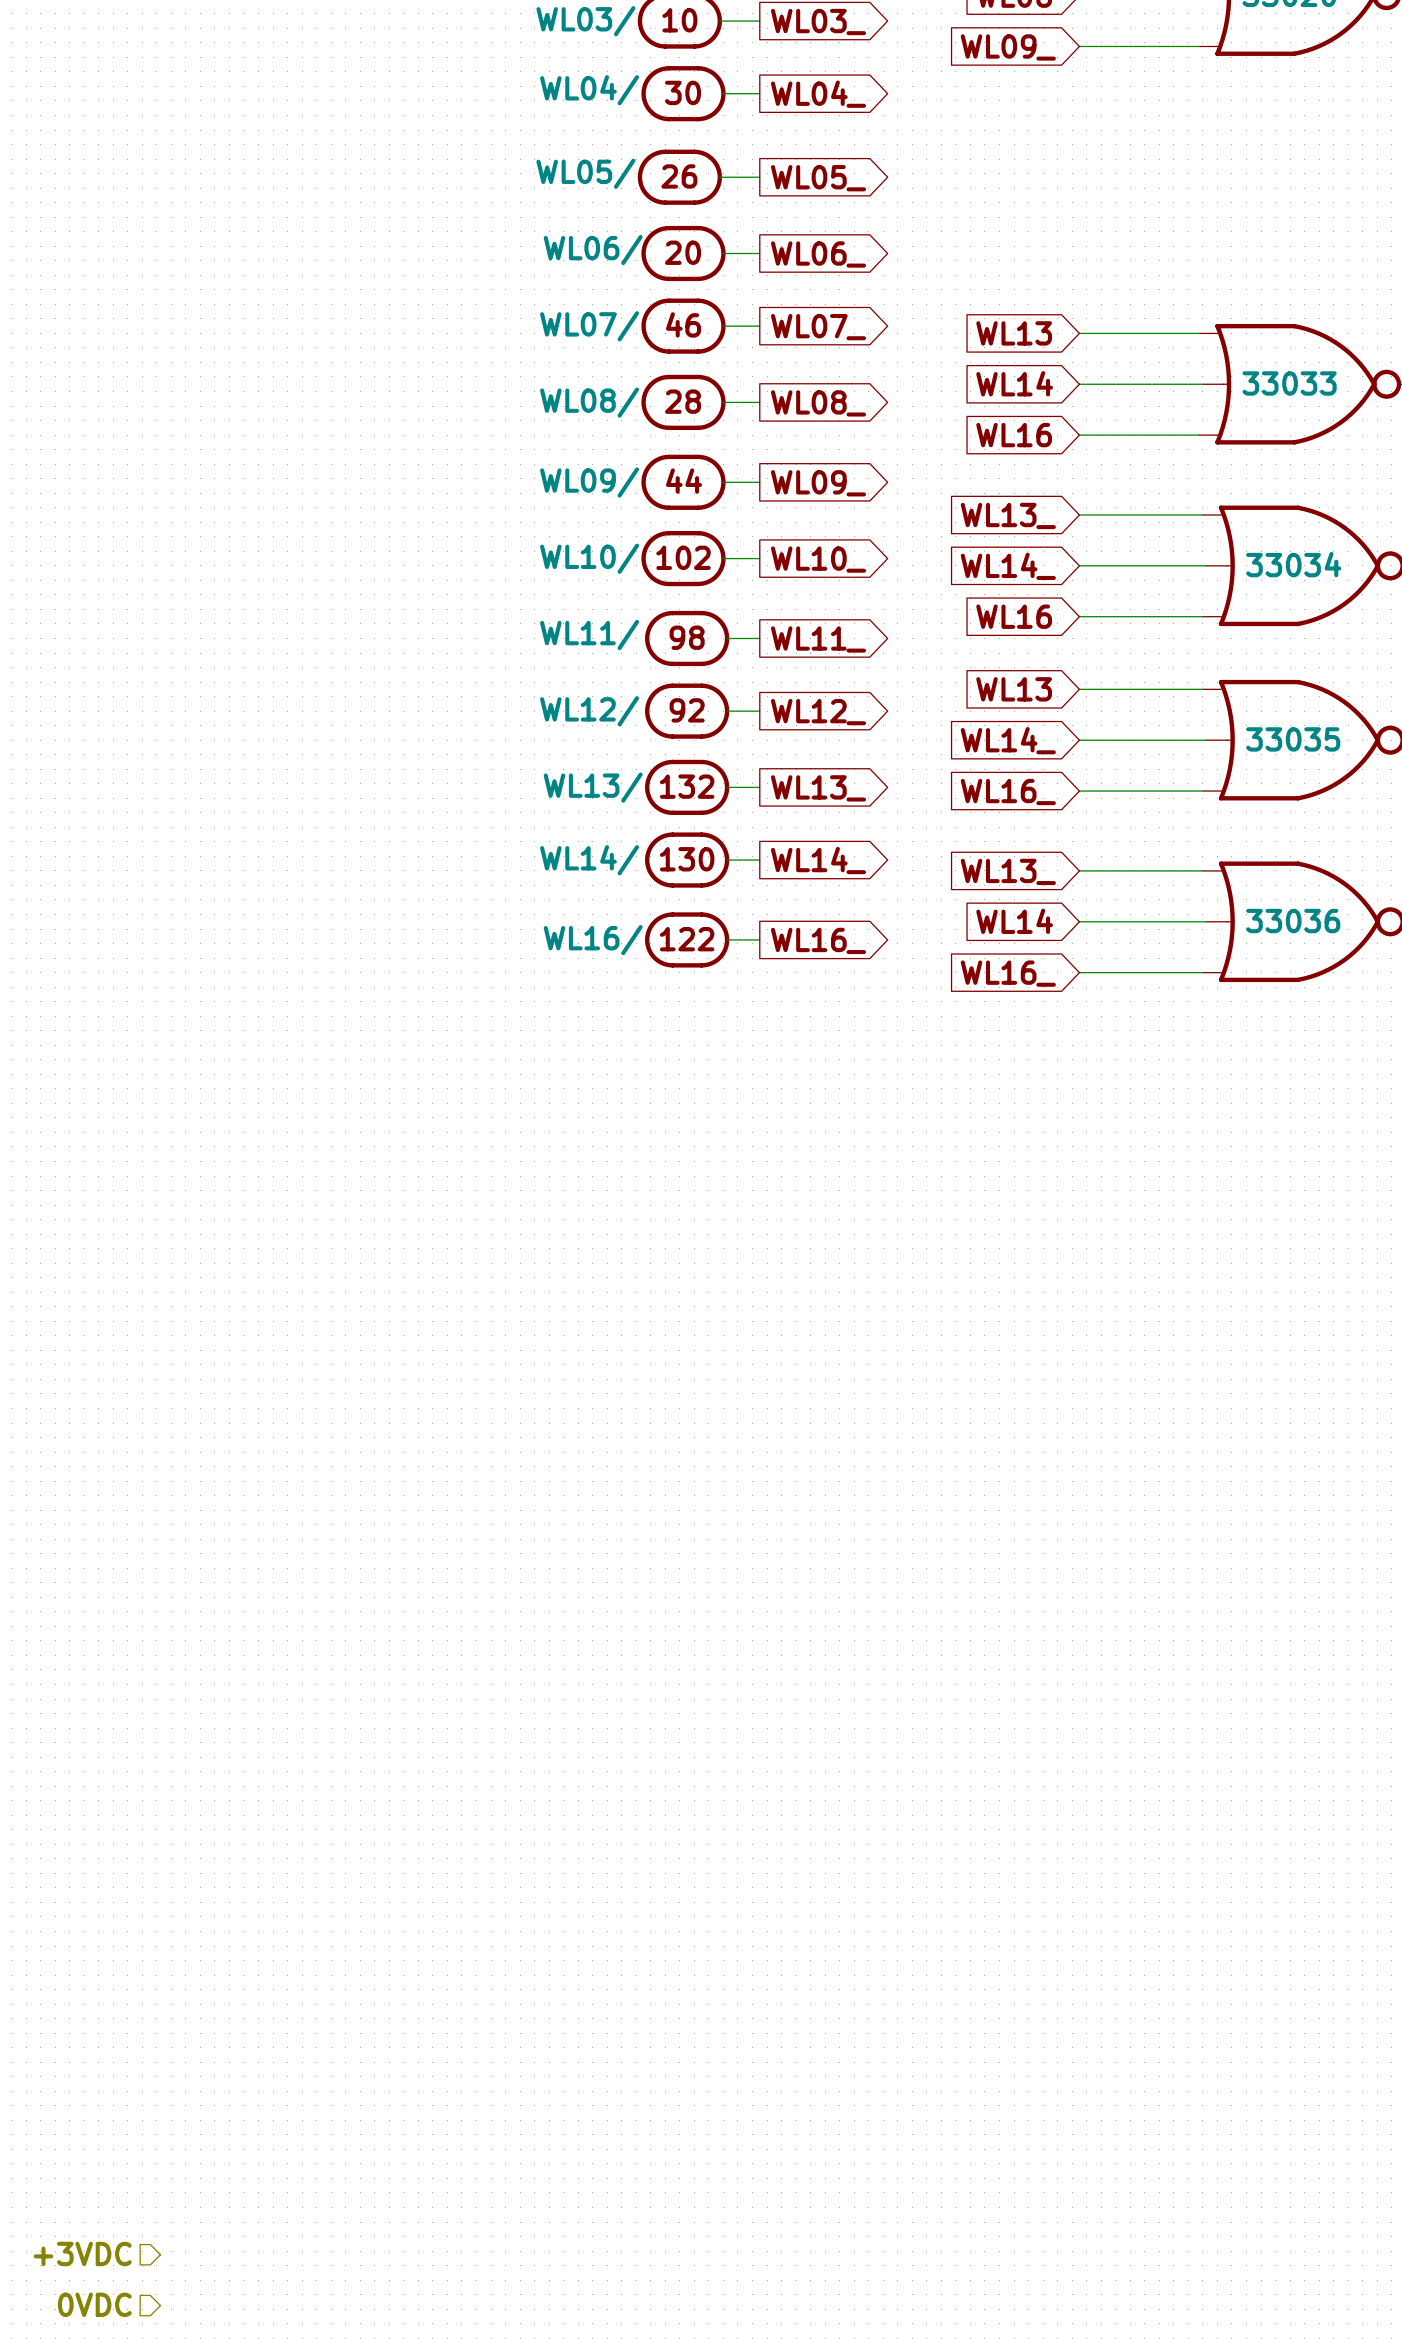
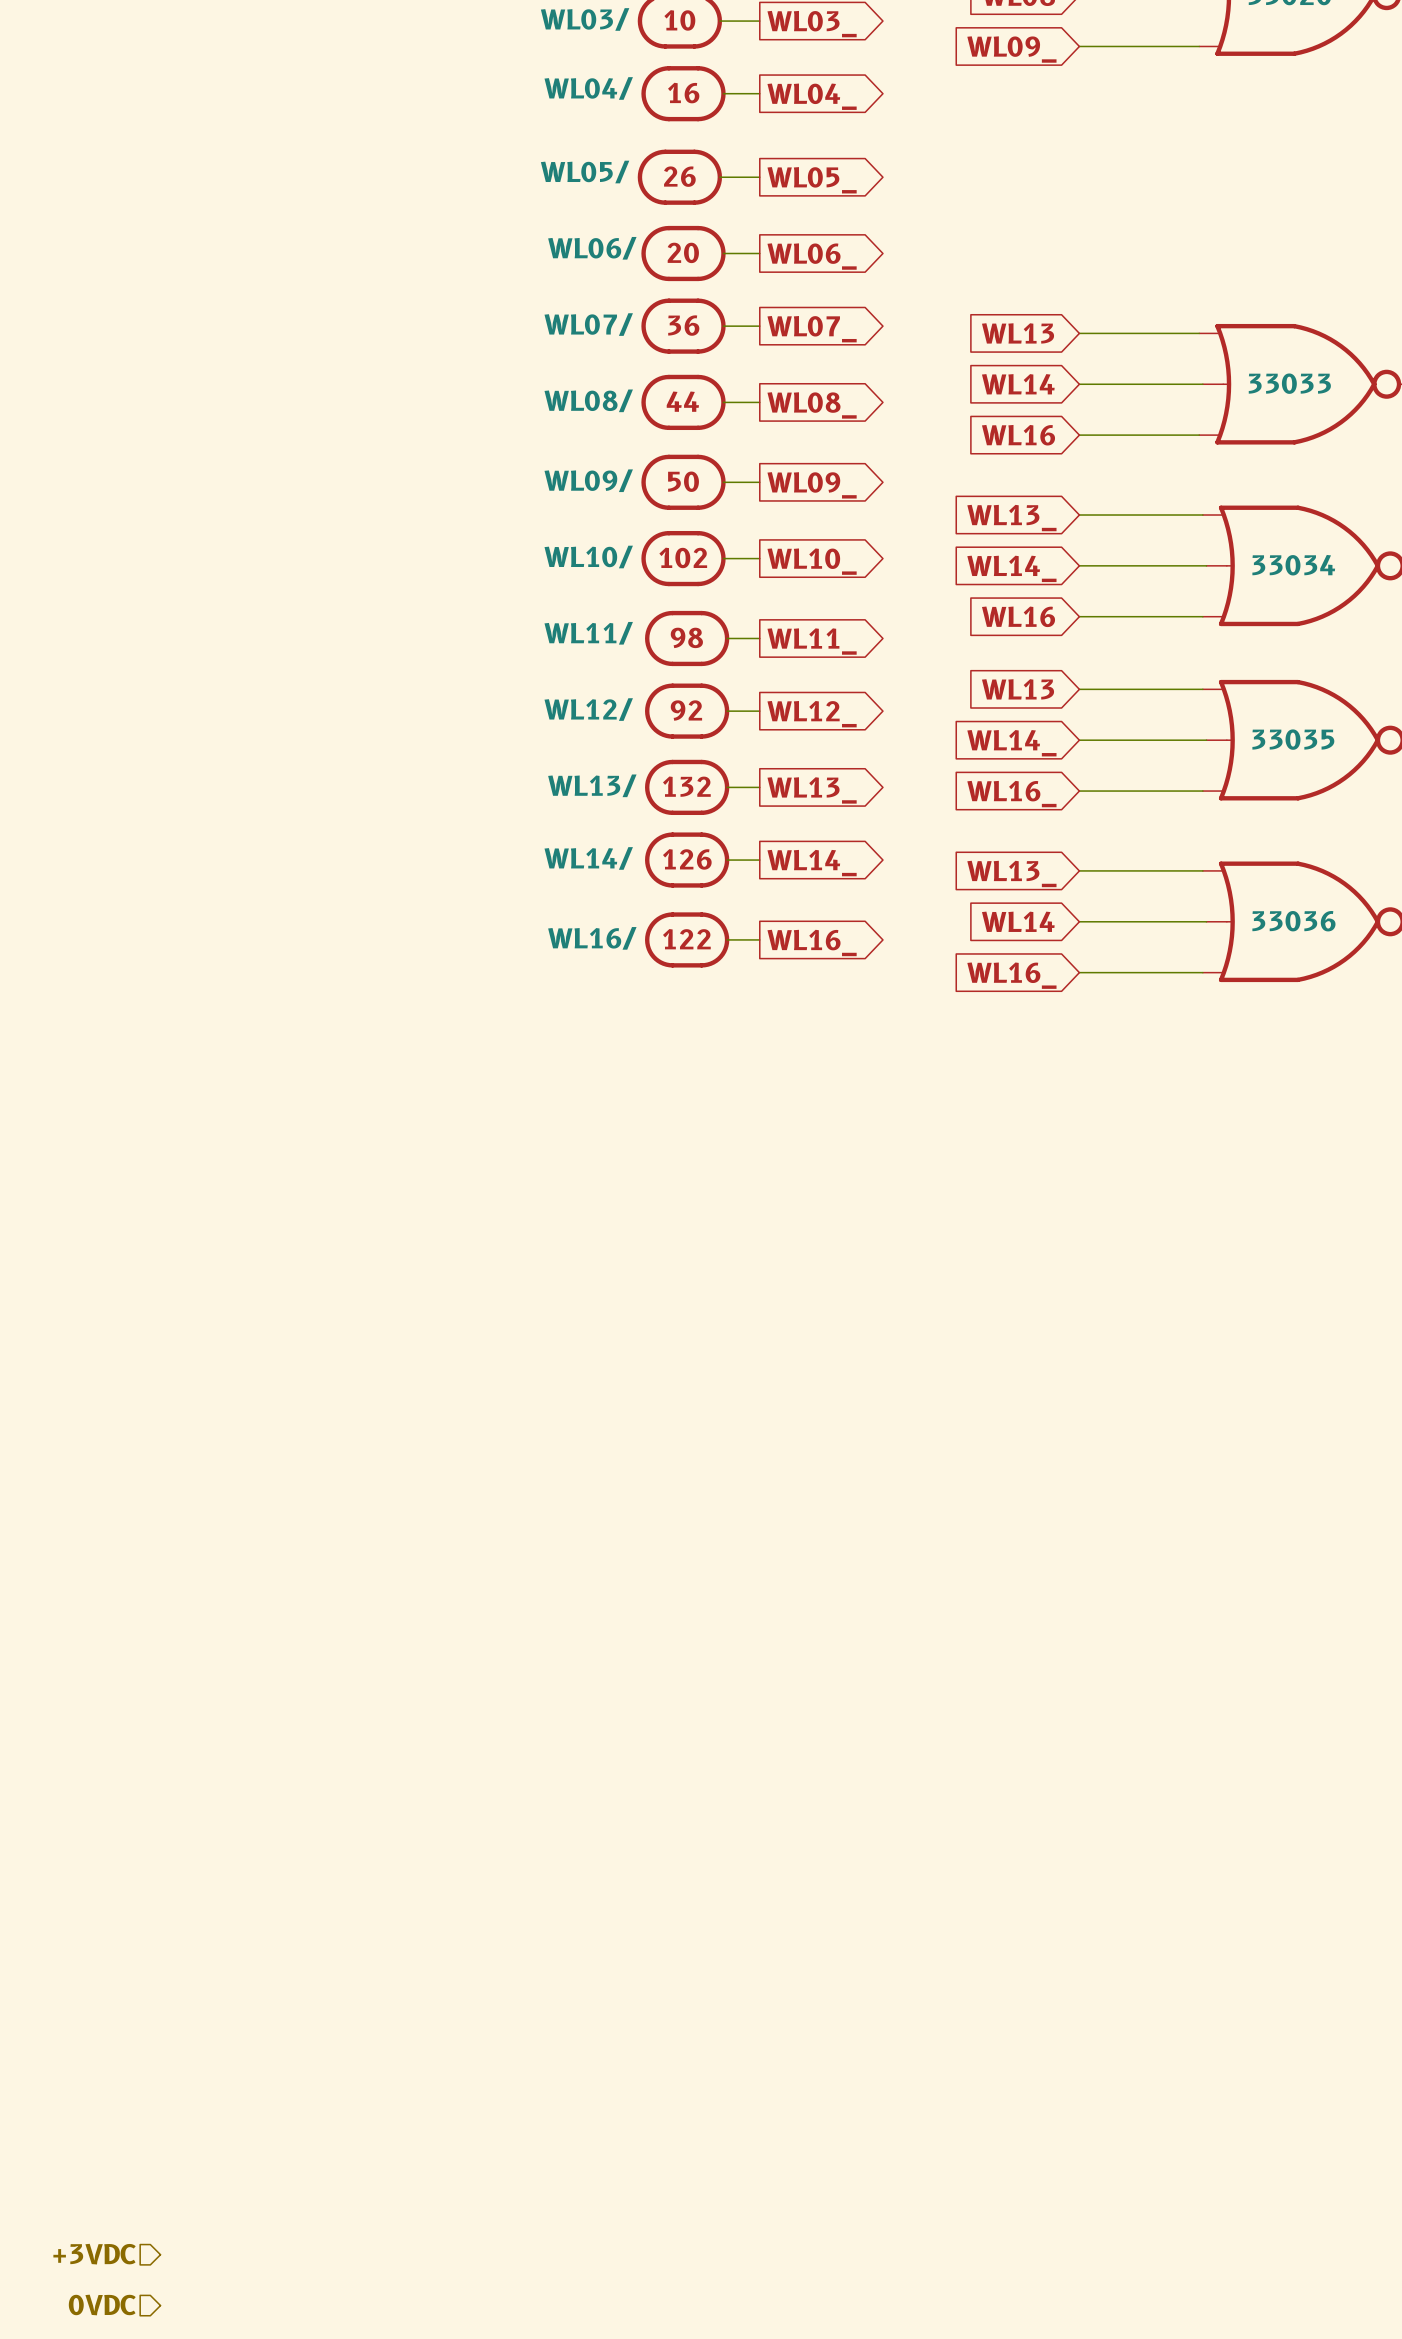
part text: 30 (683, 92) -> 16 (683, 93)
part text: 46 (683, 324) -> 36 (683, 325)
part text: 28 (683, 401) -> 44 (682, 401)
part text: 44 (684, 481) -> 50 (683, 481)
part text: 130 (687, 859) -> 126 (687, 859)

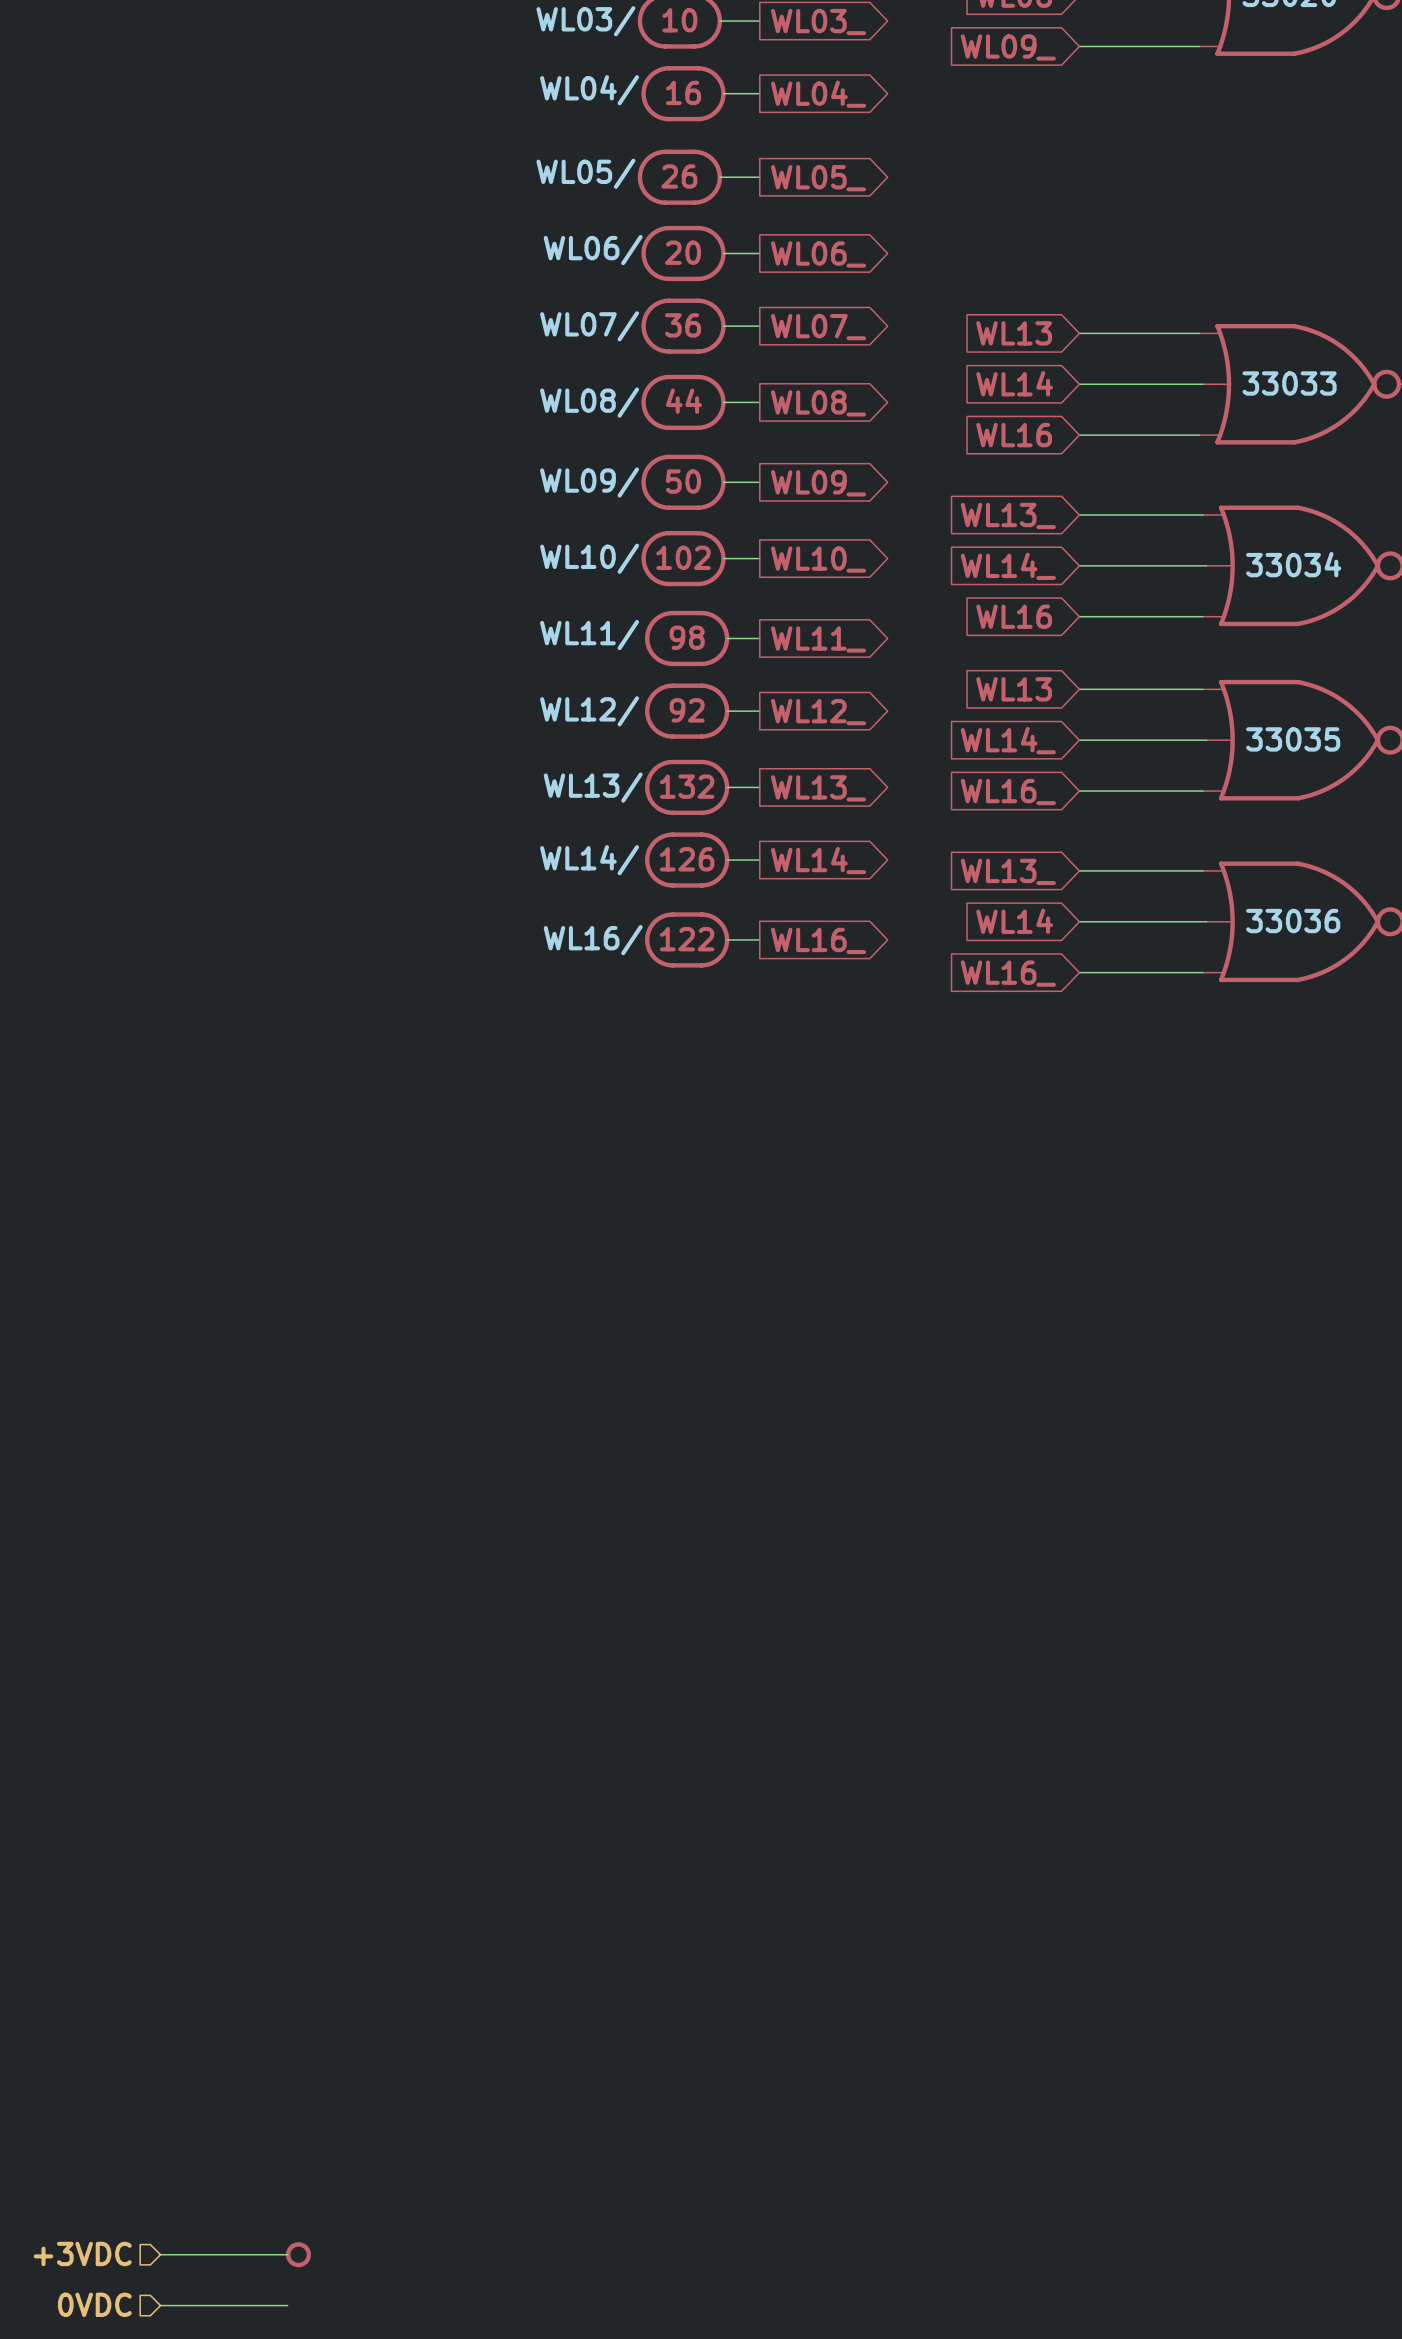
wire: none -> (160, 2254) (287, 2254)
part: none -> (298, 2254)
wire: none -> (160, 2305) (287, 2305)

